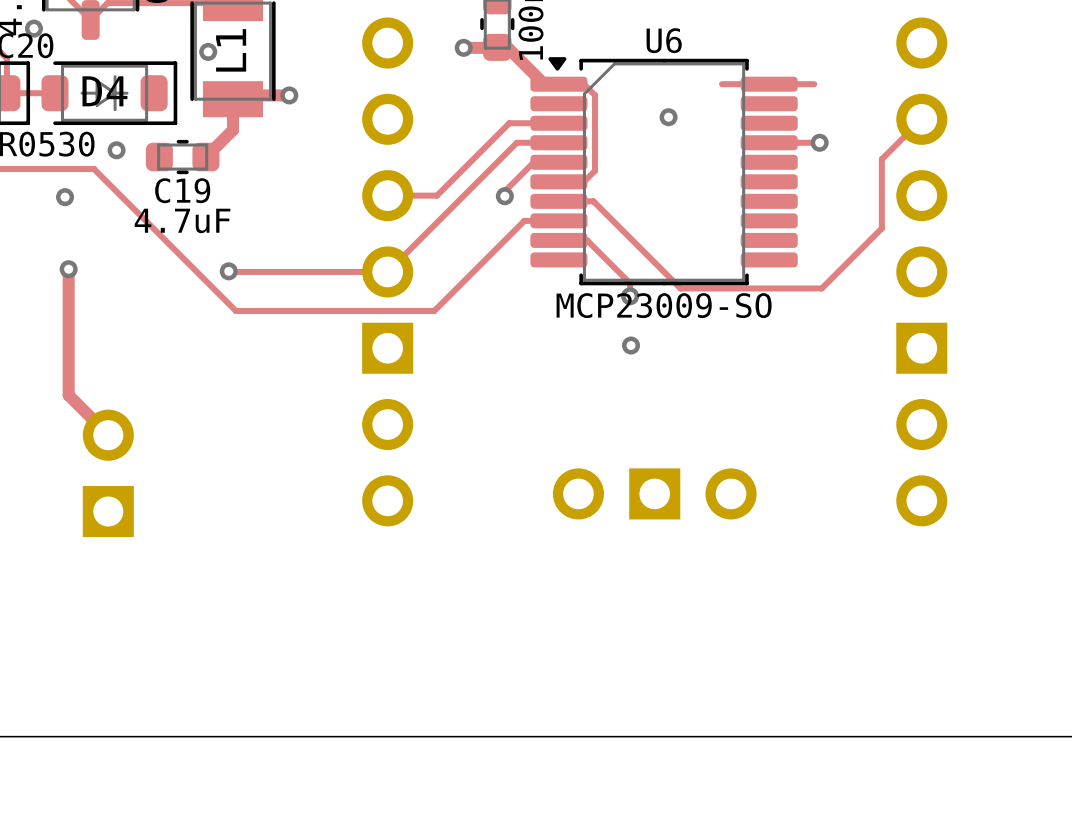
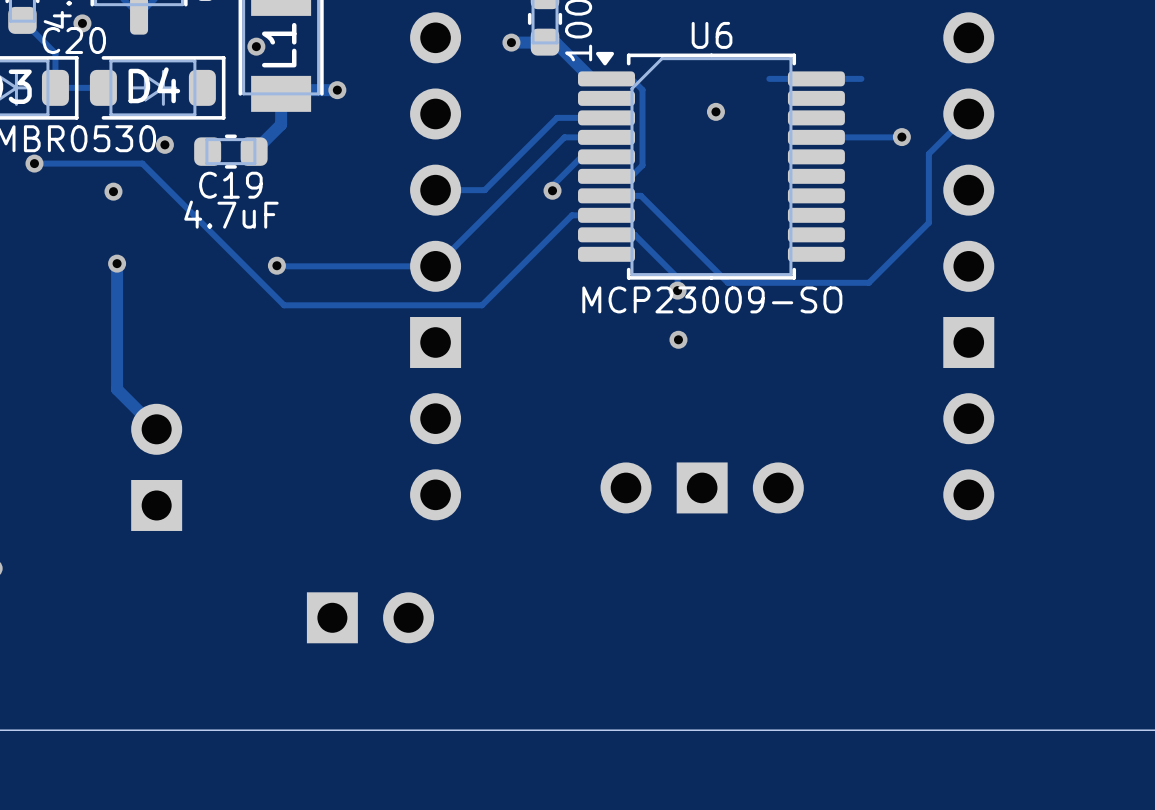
track: none -> (866, 137) (901, 137)
via position: (819, 142) -> (901, 137)
part: none -> (370, 617)

